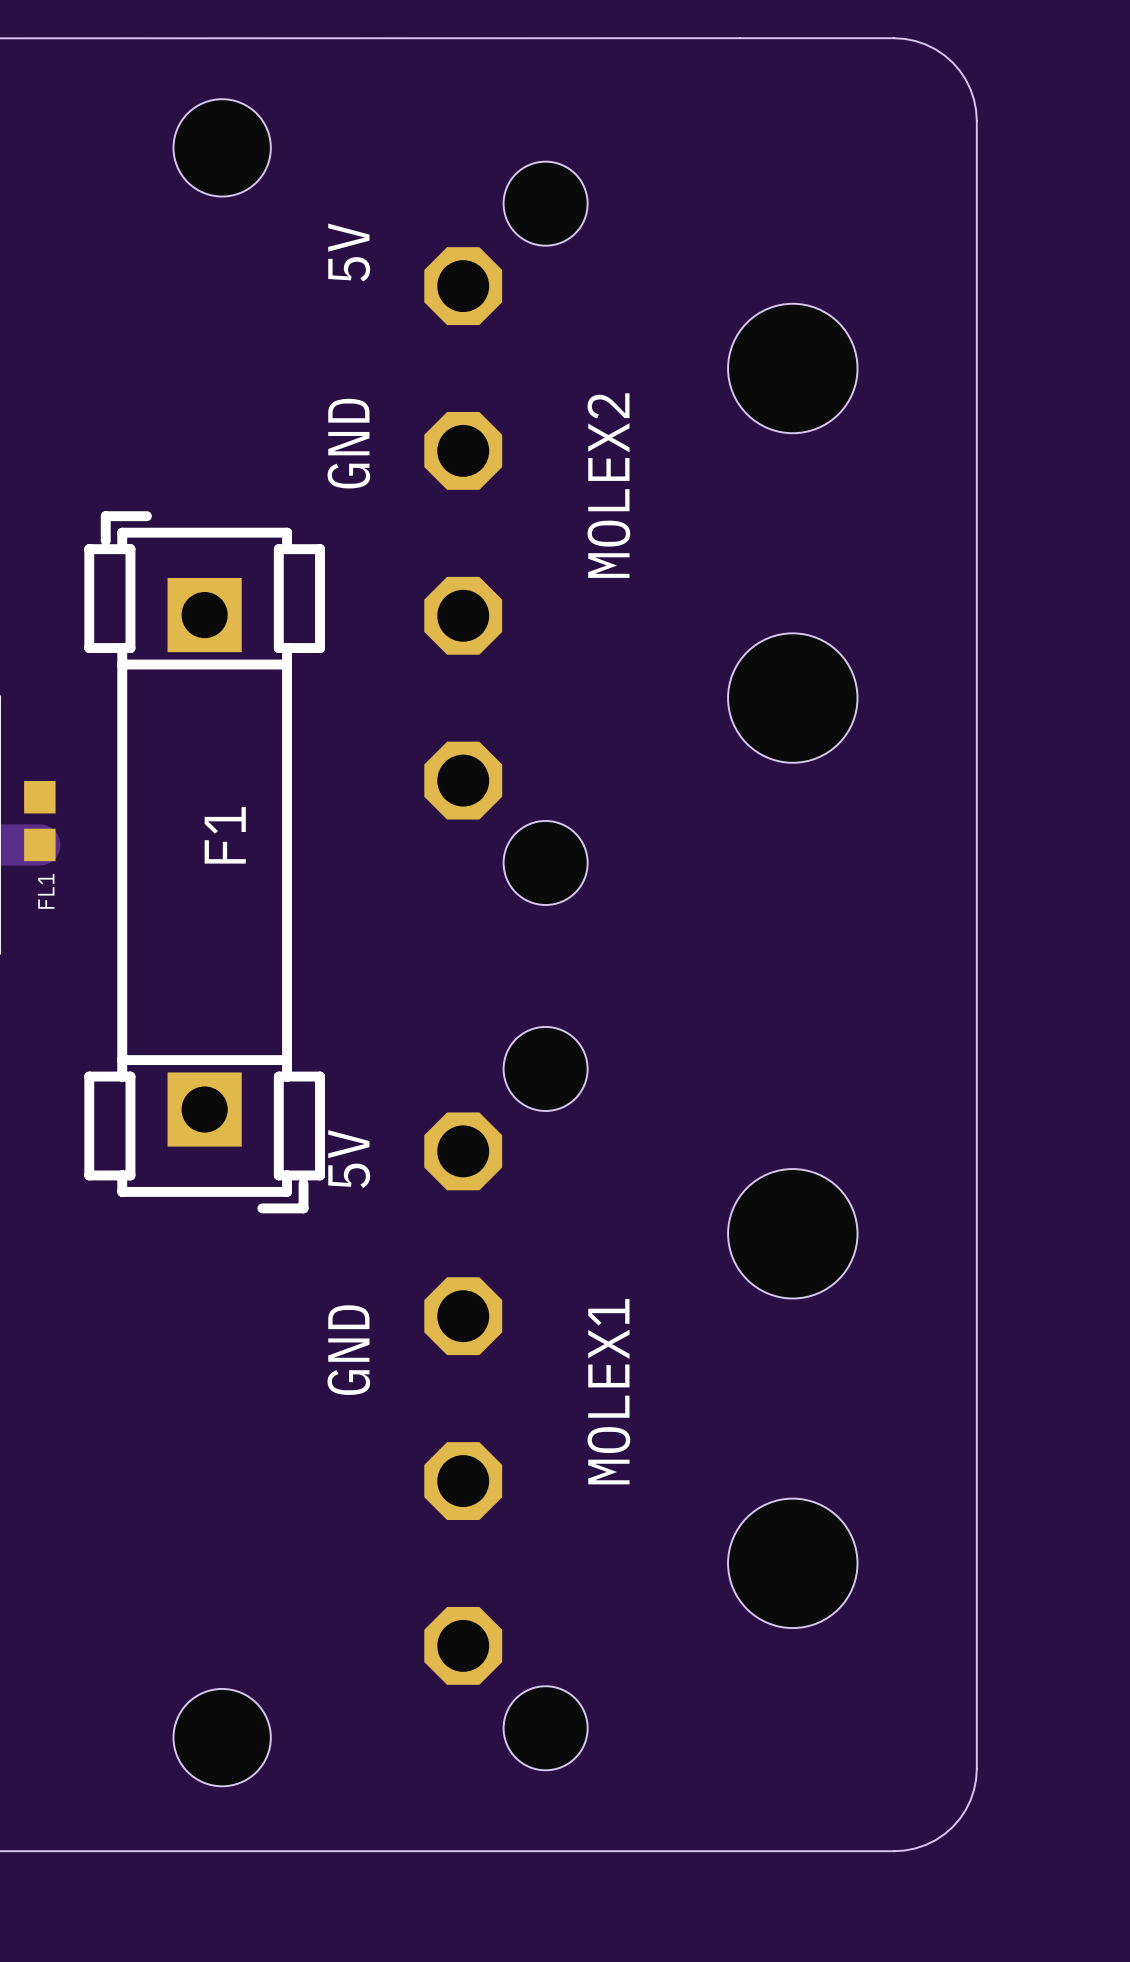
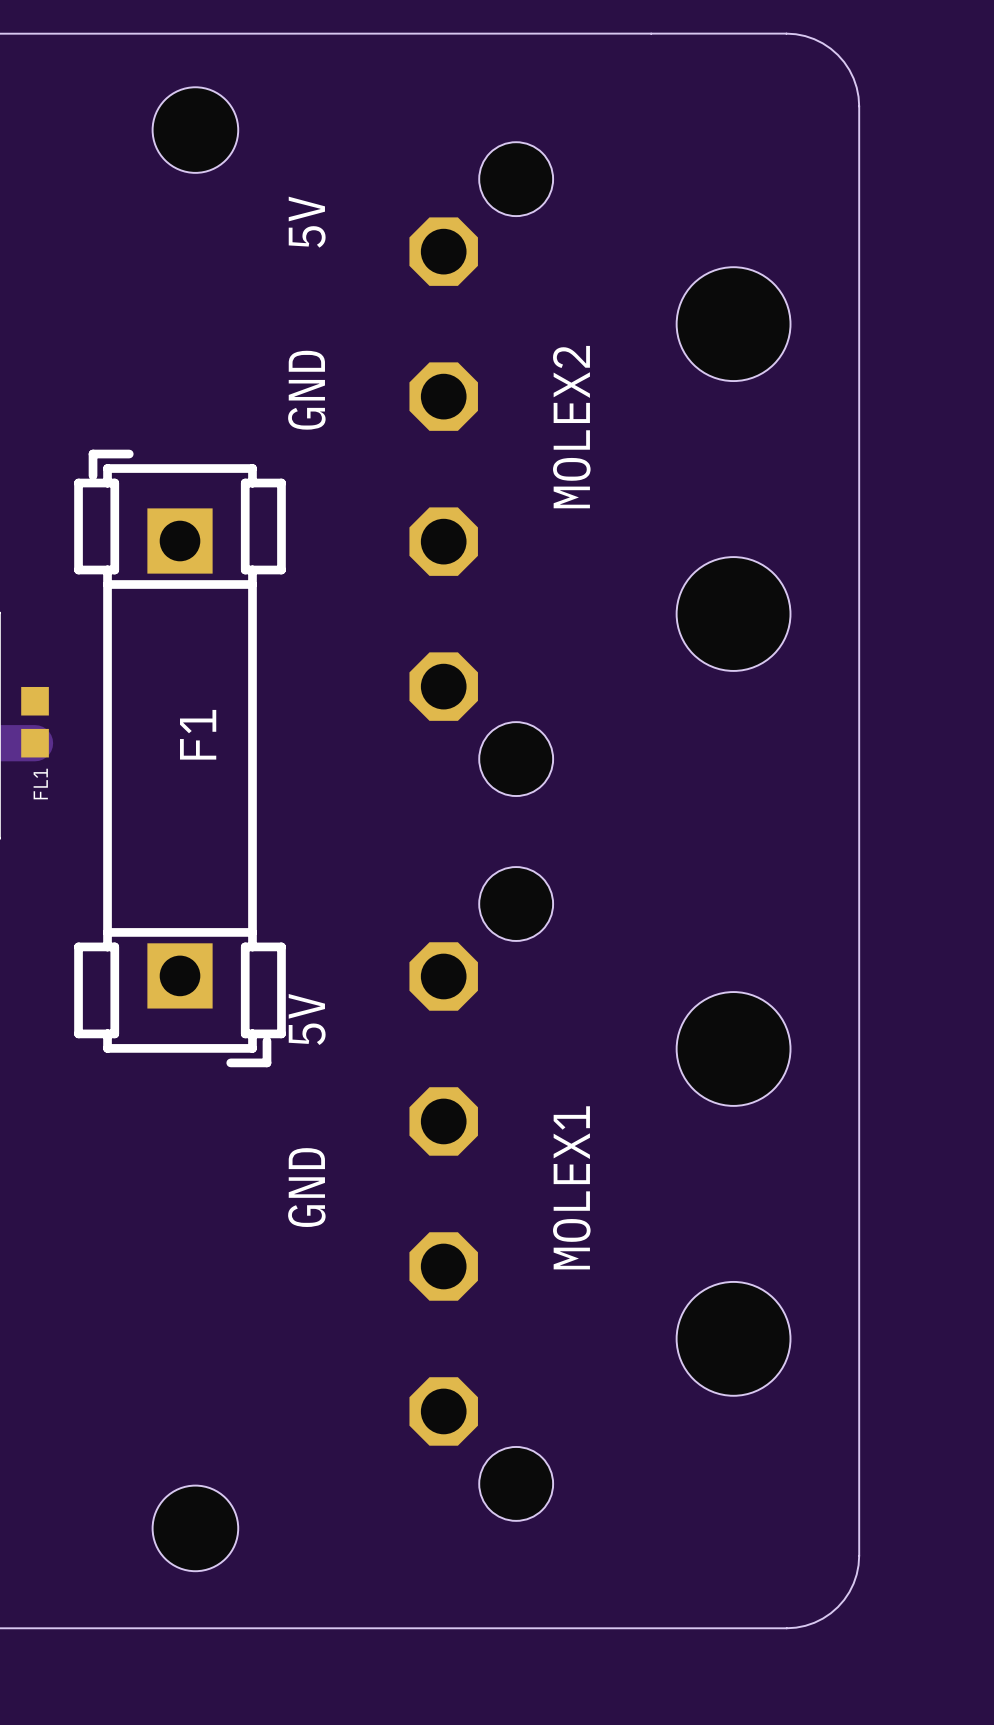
MOLEX2 position: (640, 533) -> (599, 469)
MOLEX1 position: (640, 1398) -> (599, 1193)

